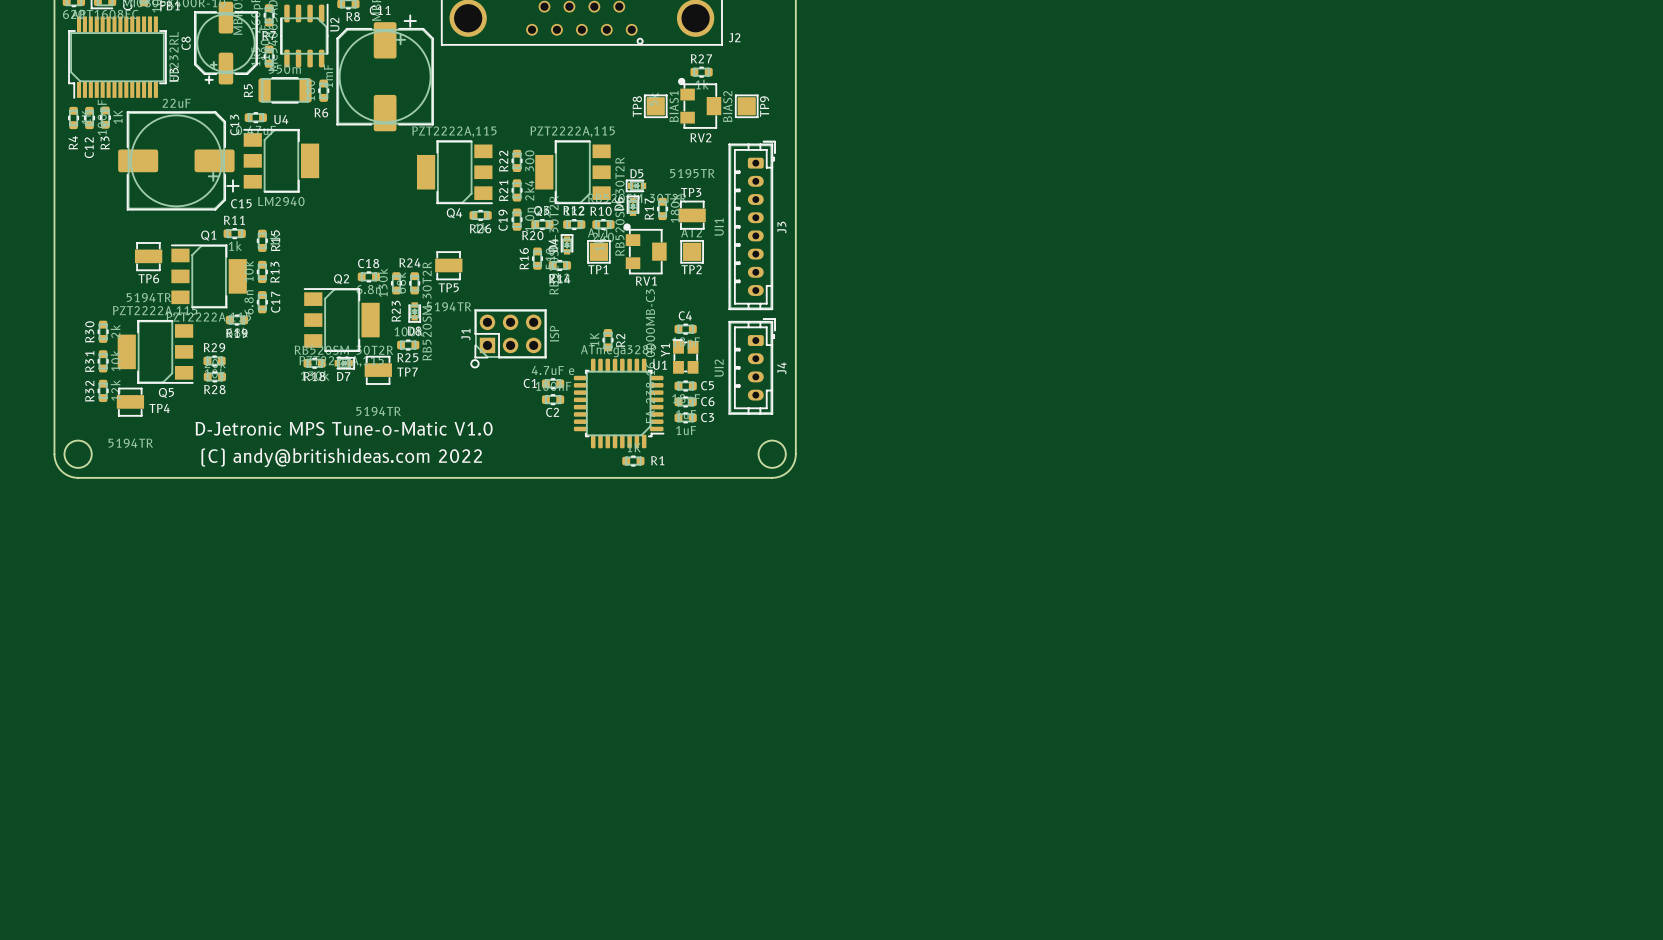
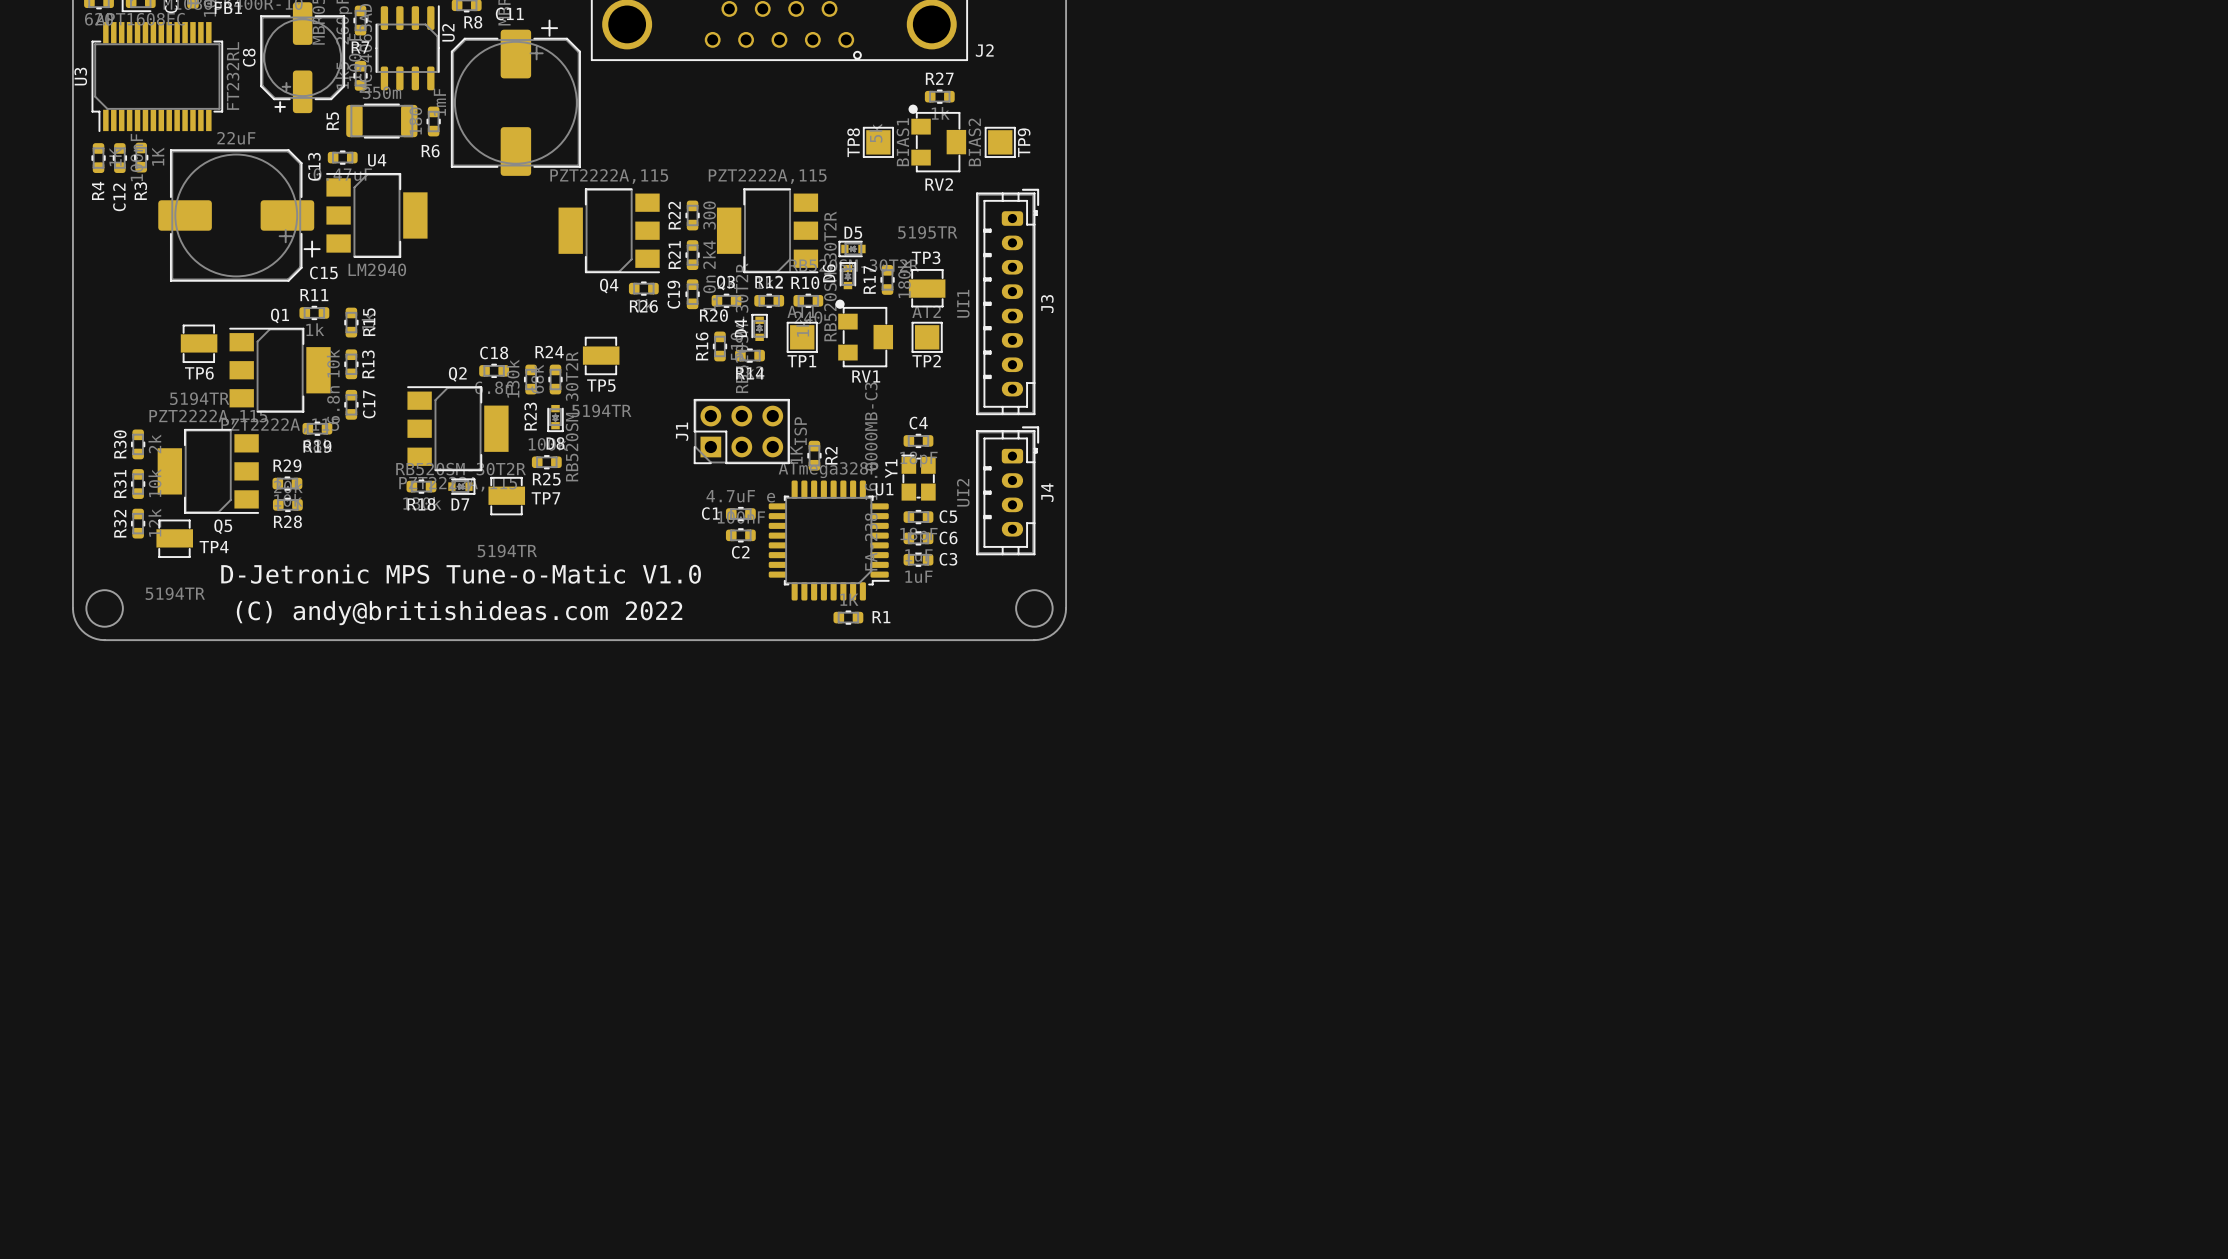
U3 name position: U3 (174, 74) -> U3 (80, 76)
J1 position: (510, 333) -> (741, 431)
drawing: [470, 359, 480, 369] -> none

